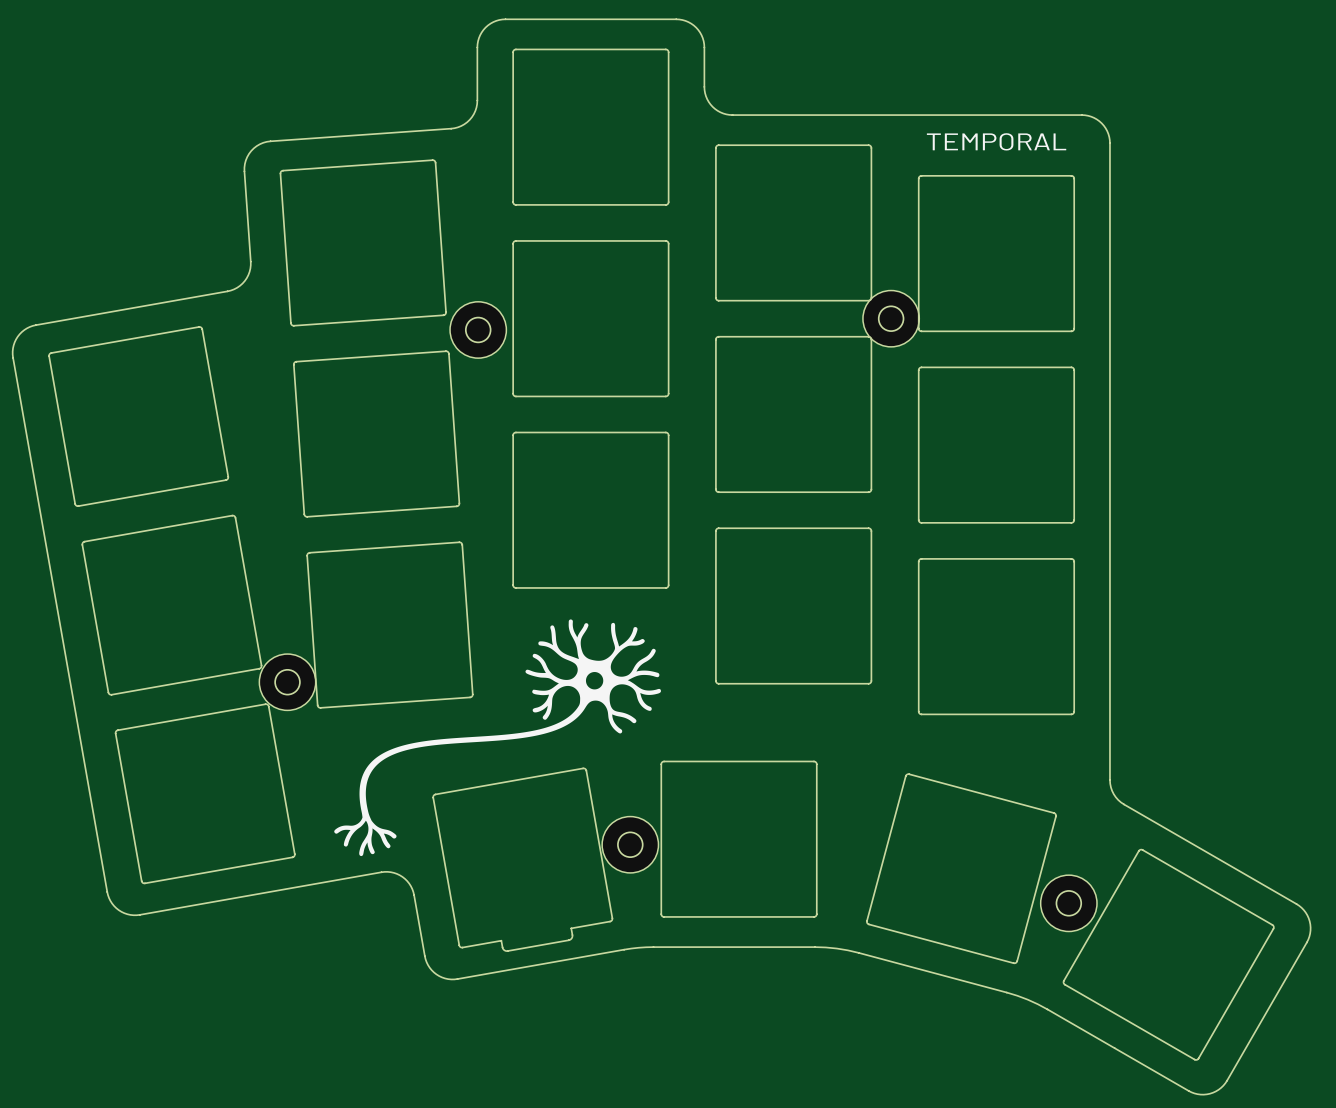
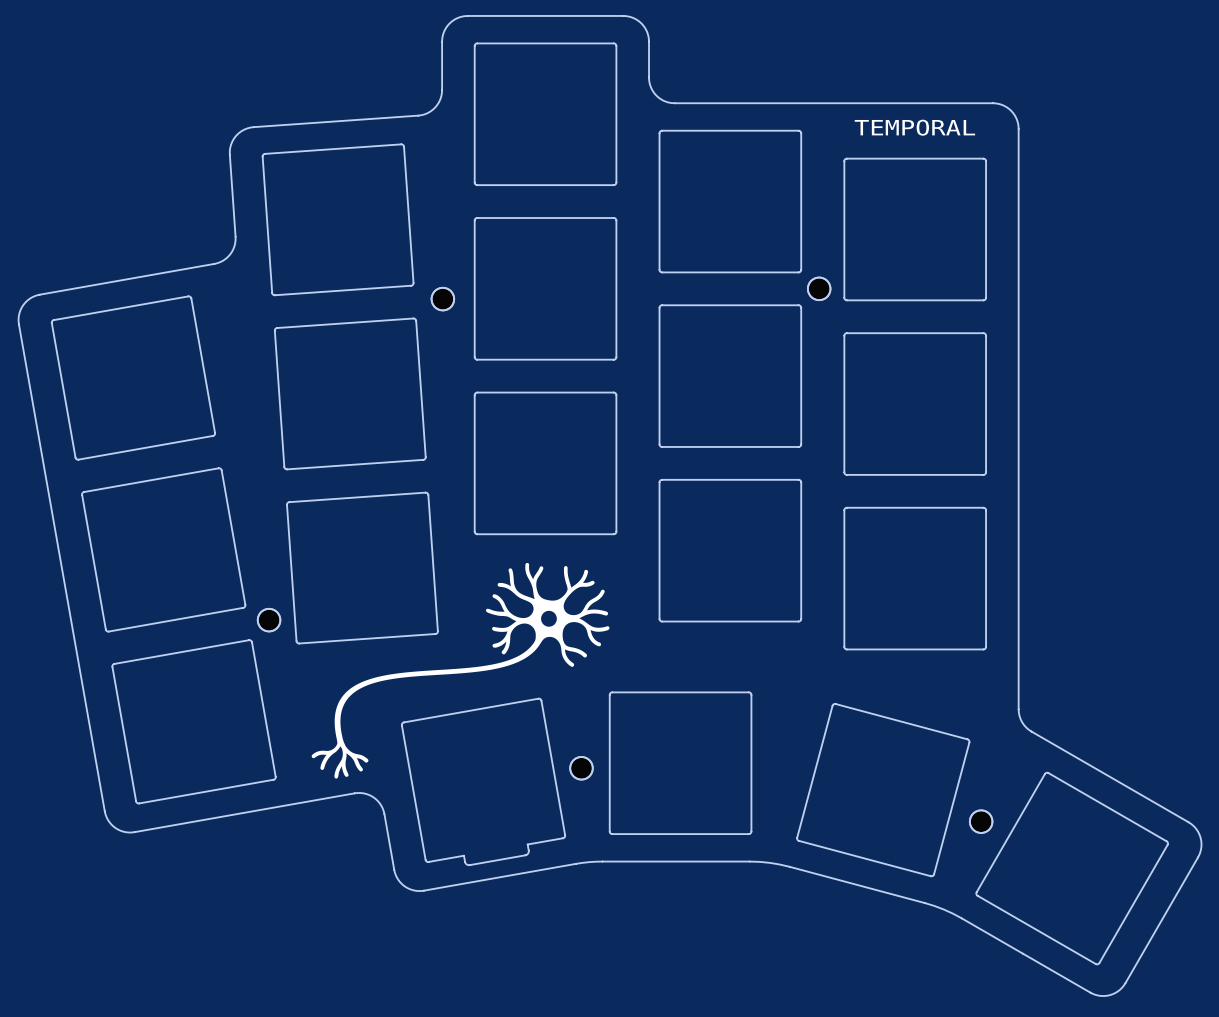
part footprint: [862, 290, 920, 347] -> [807, 277, 831, 301]
part footprint: [450, 301, 507, 359] -> [431, 287, 455, 311]
part footprint: [259, 654, 316, 711] -> [257, 608, 281, 632]
part footprint: [602, 816, 659, 873] -> [570, 756, 593, 780]
part footprint: [1040, 875, 1098, 932] -> [969, 810, 993, 833]

